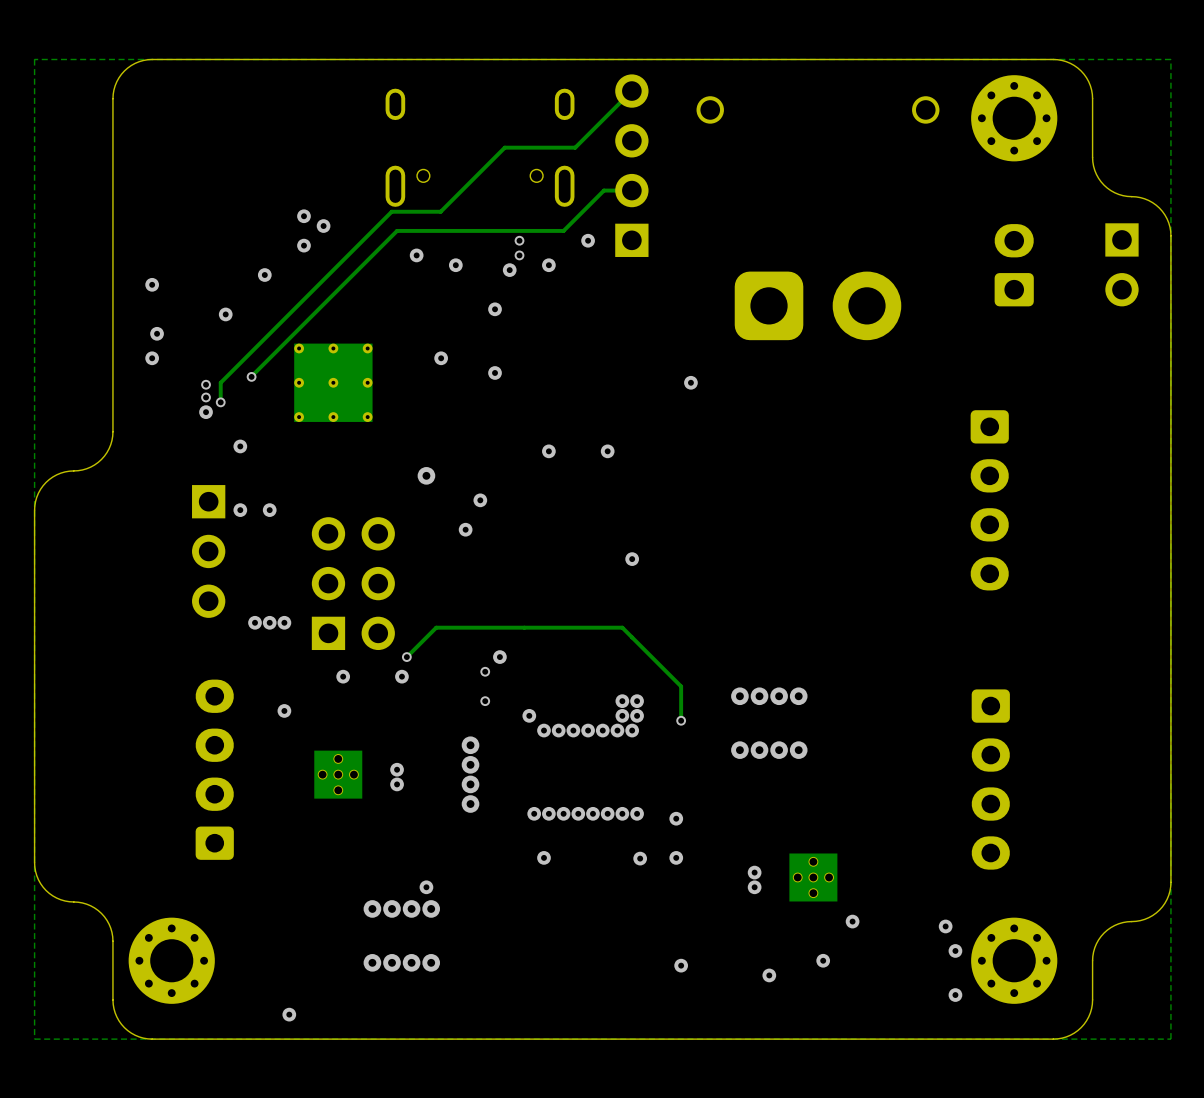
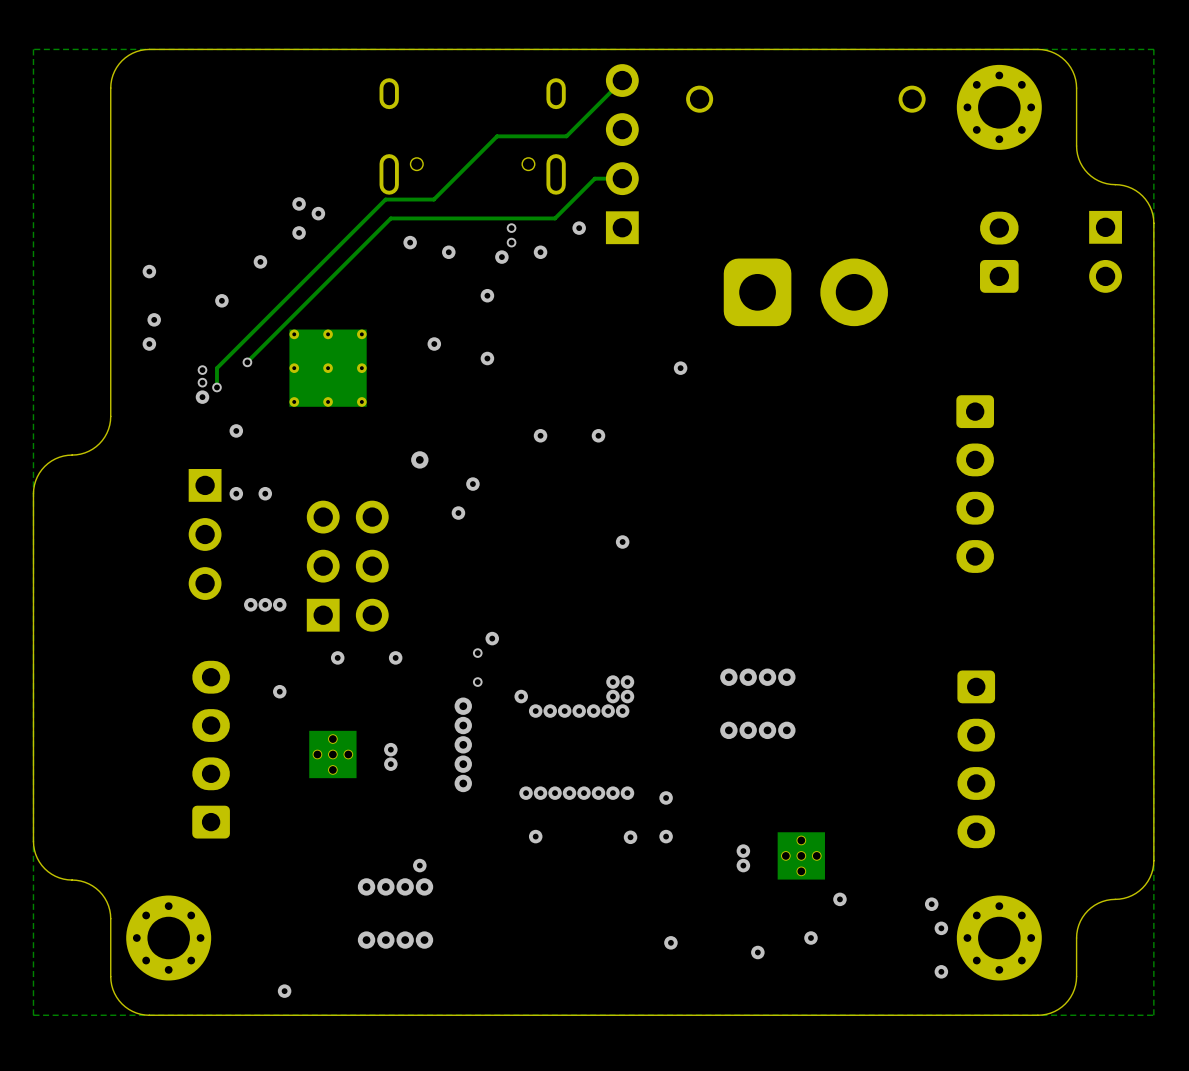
track: (406, 657) (436, 627) (622, 627) (681, 686) (681, 720) -> none
via: (406, 657) -> none
via: (681, 720) -> none
via: none -> (463, 706)

